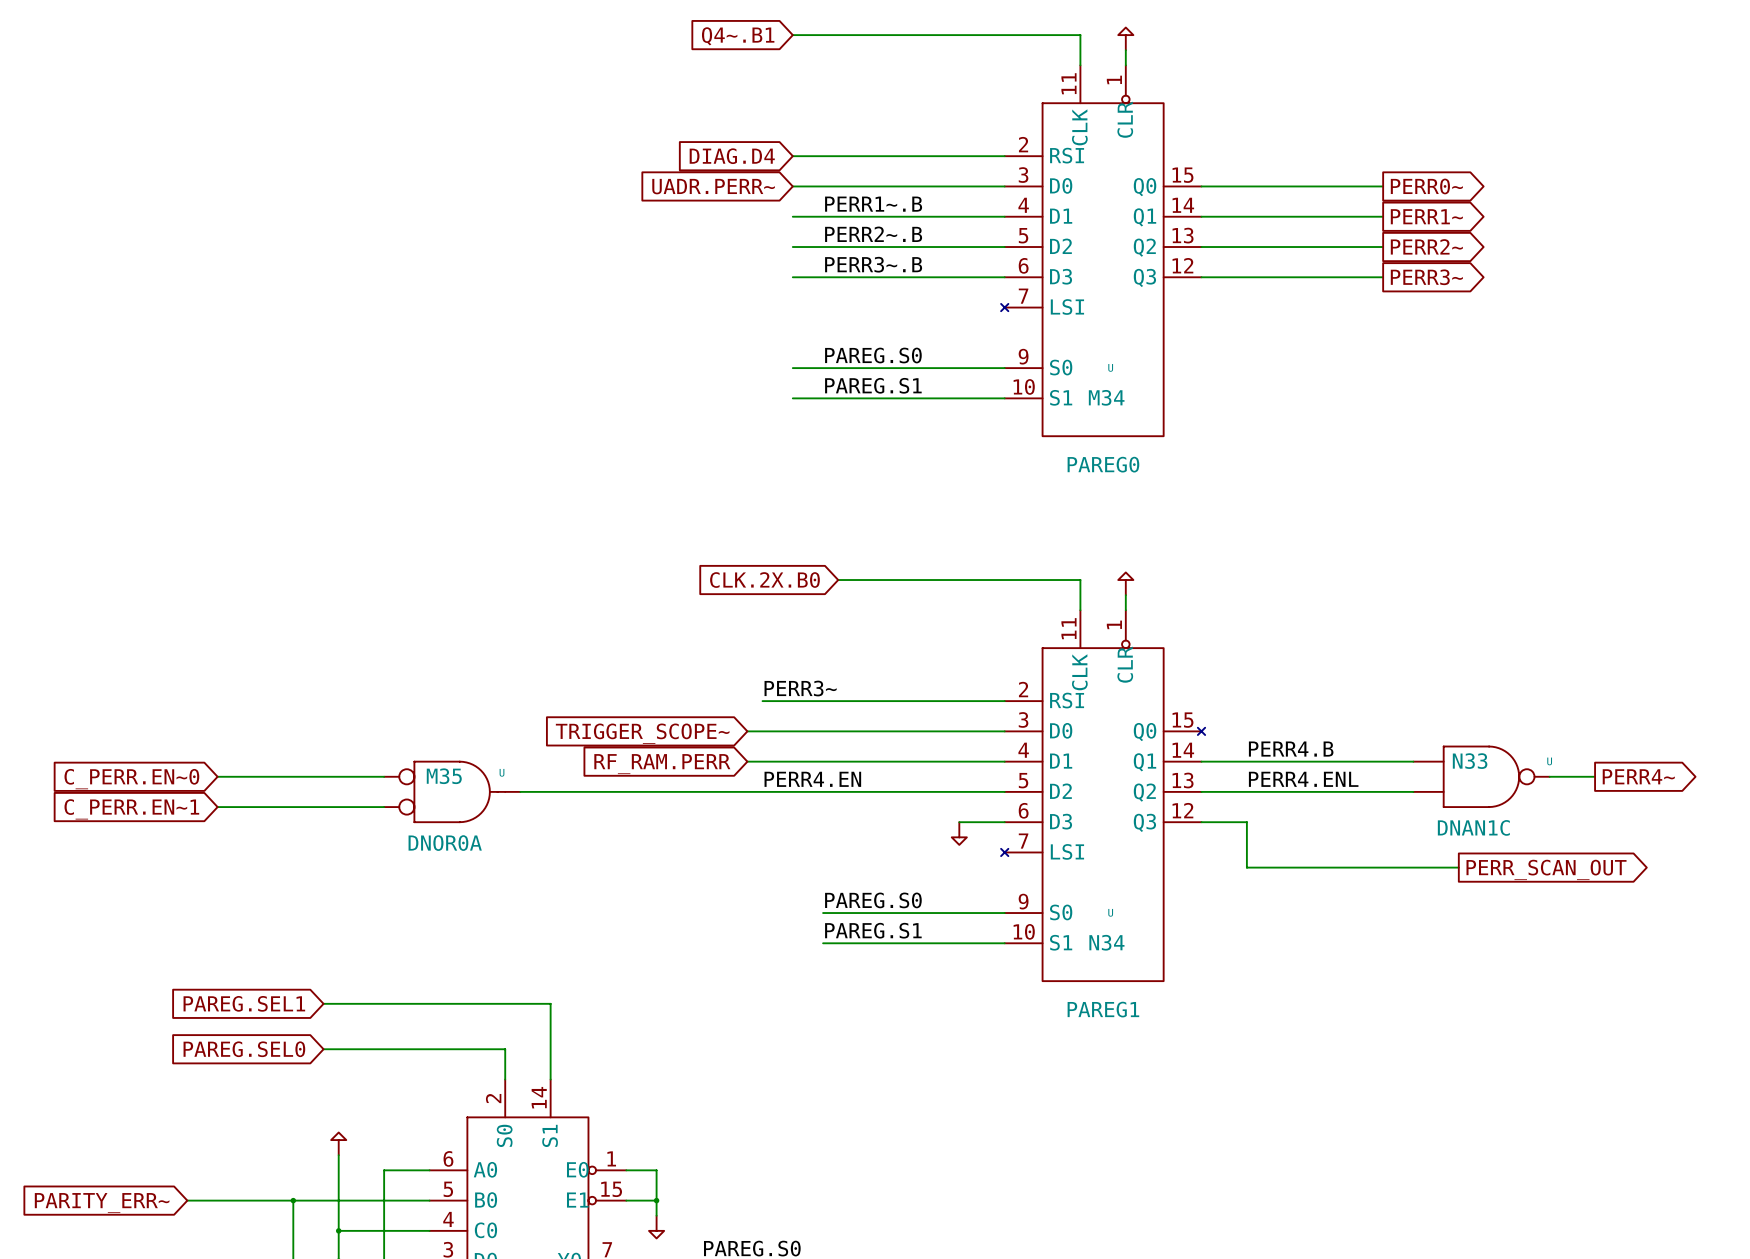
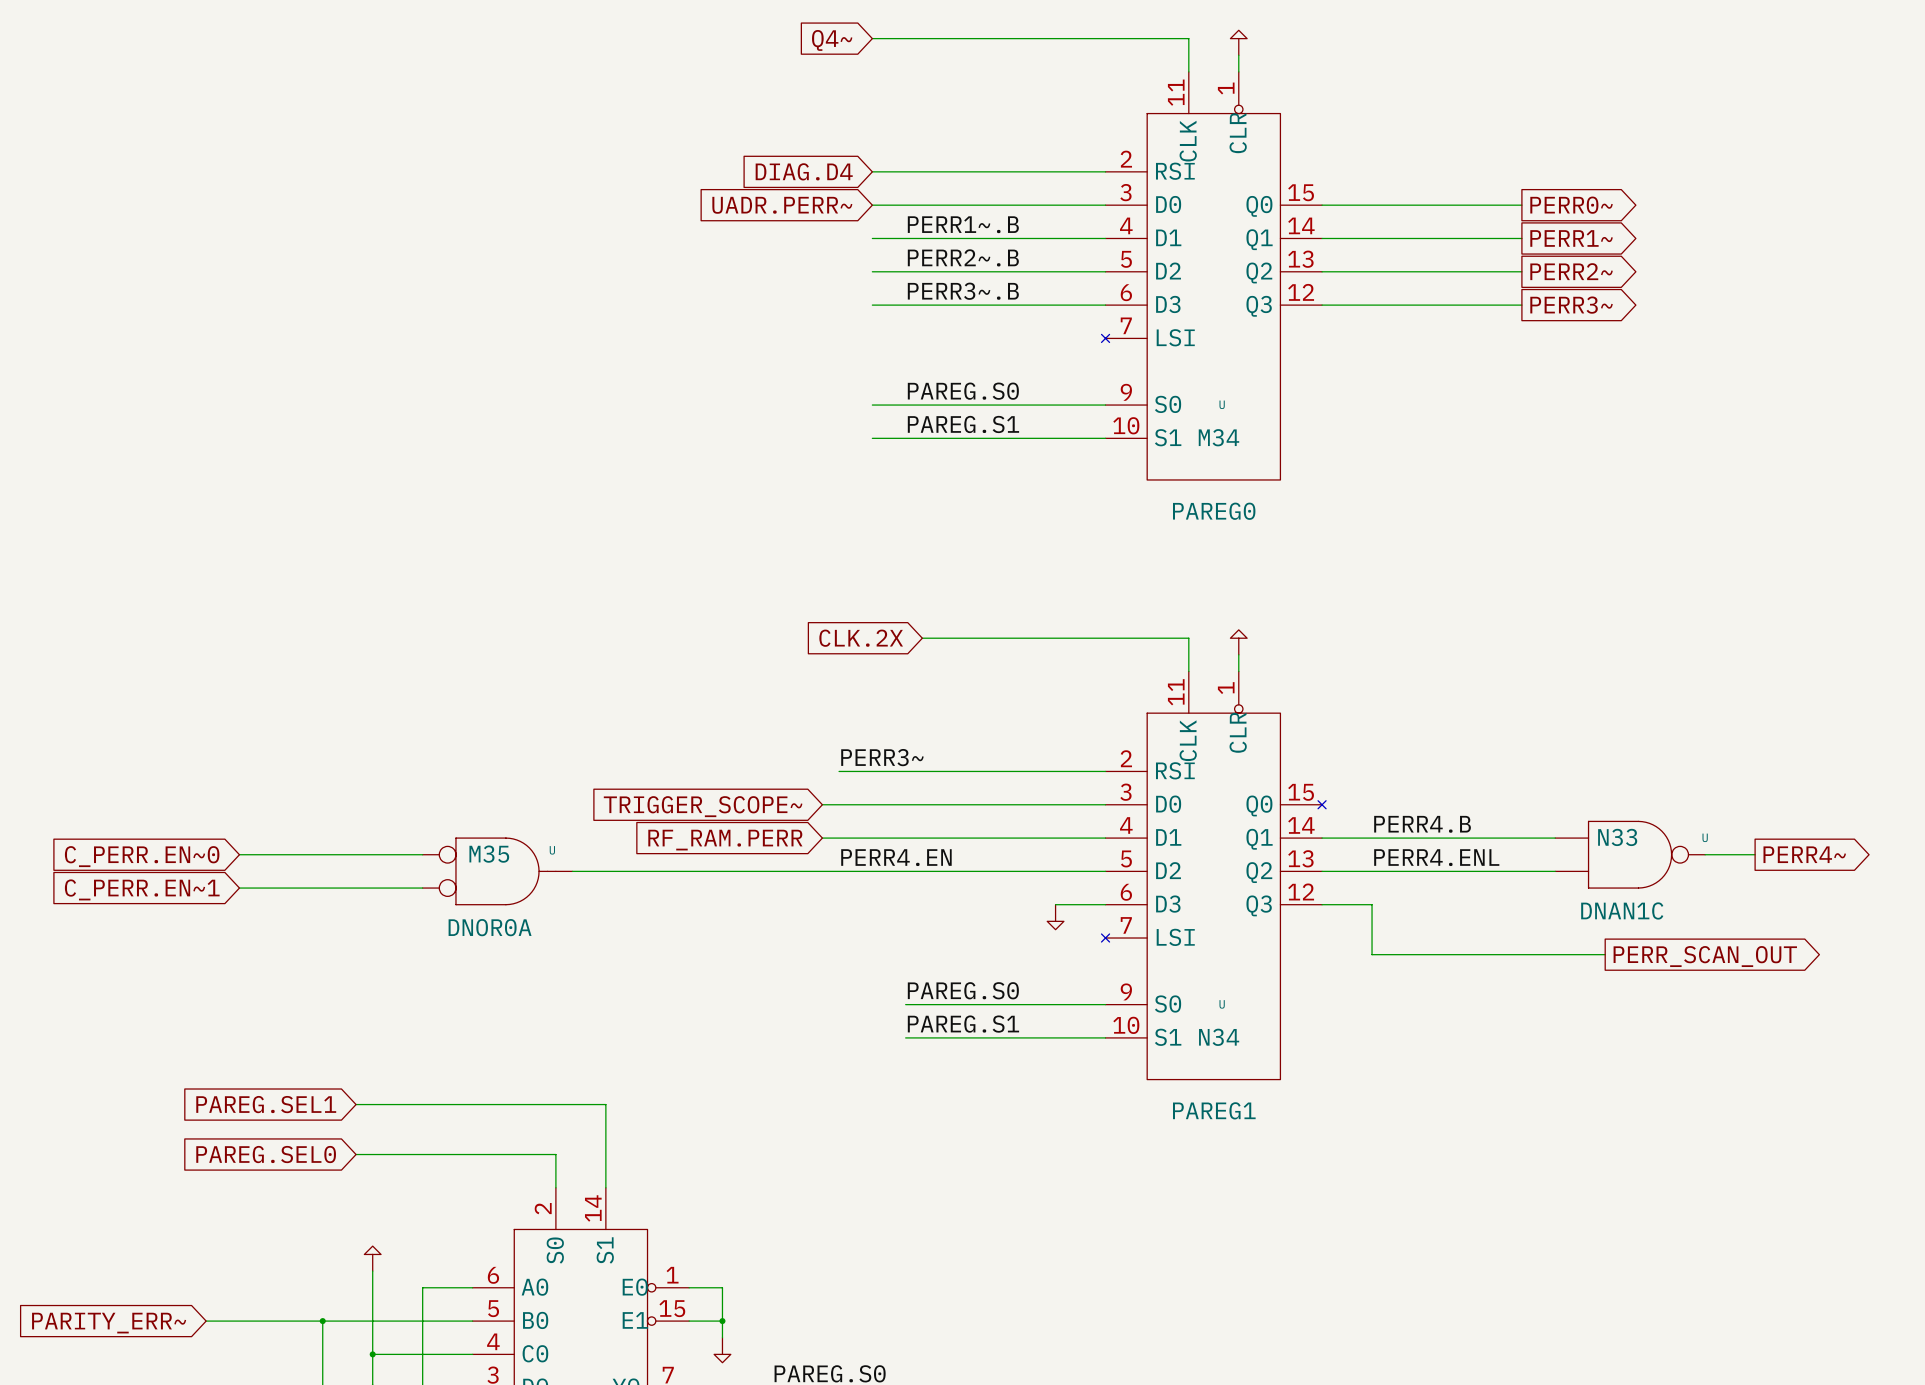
global label: Q4~.B1 (738, 36) -> Q4~ (832, 40)
global label: CLK.2X.B0 (764, 580) -> CLK.2X (861, 638)

